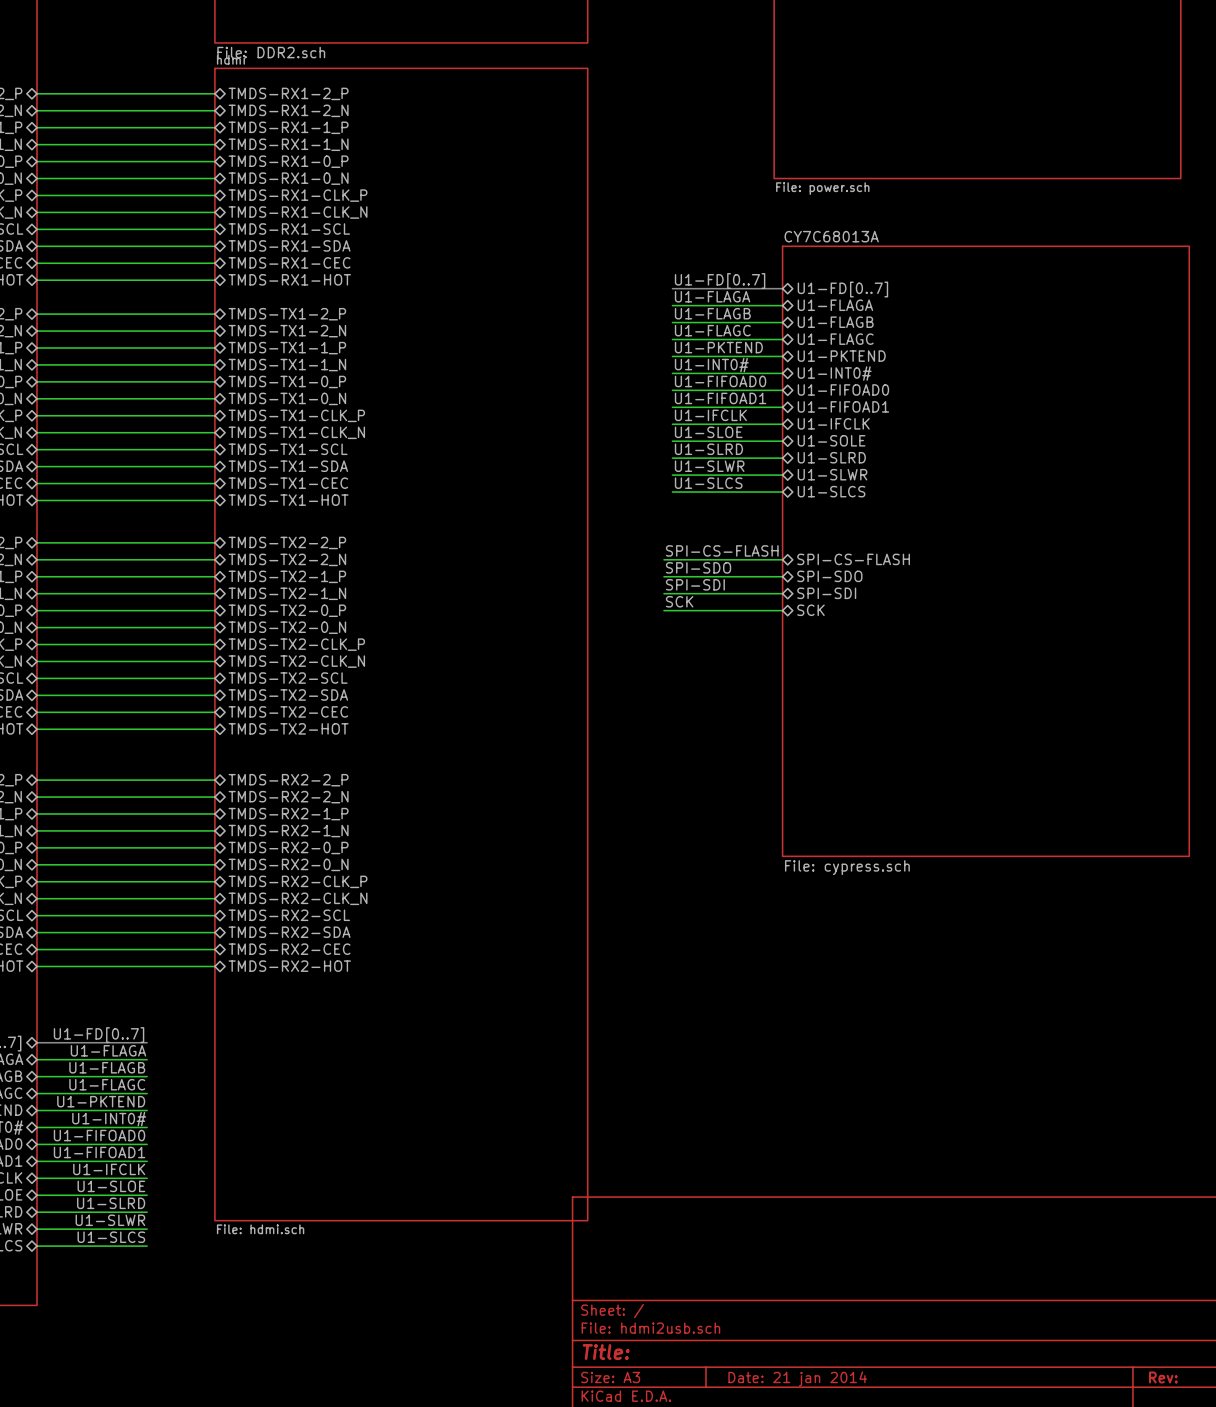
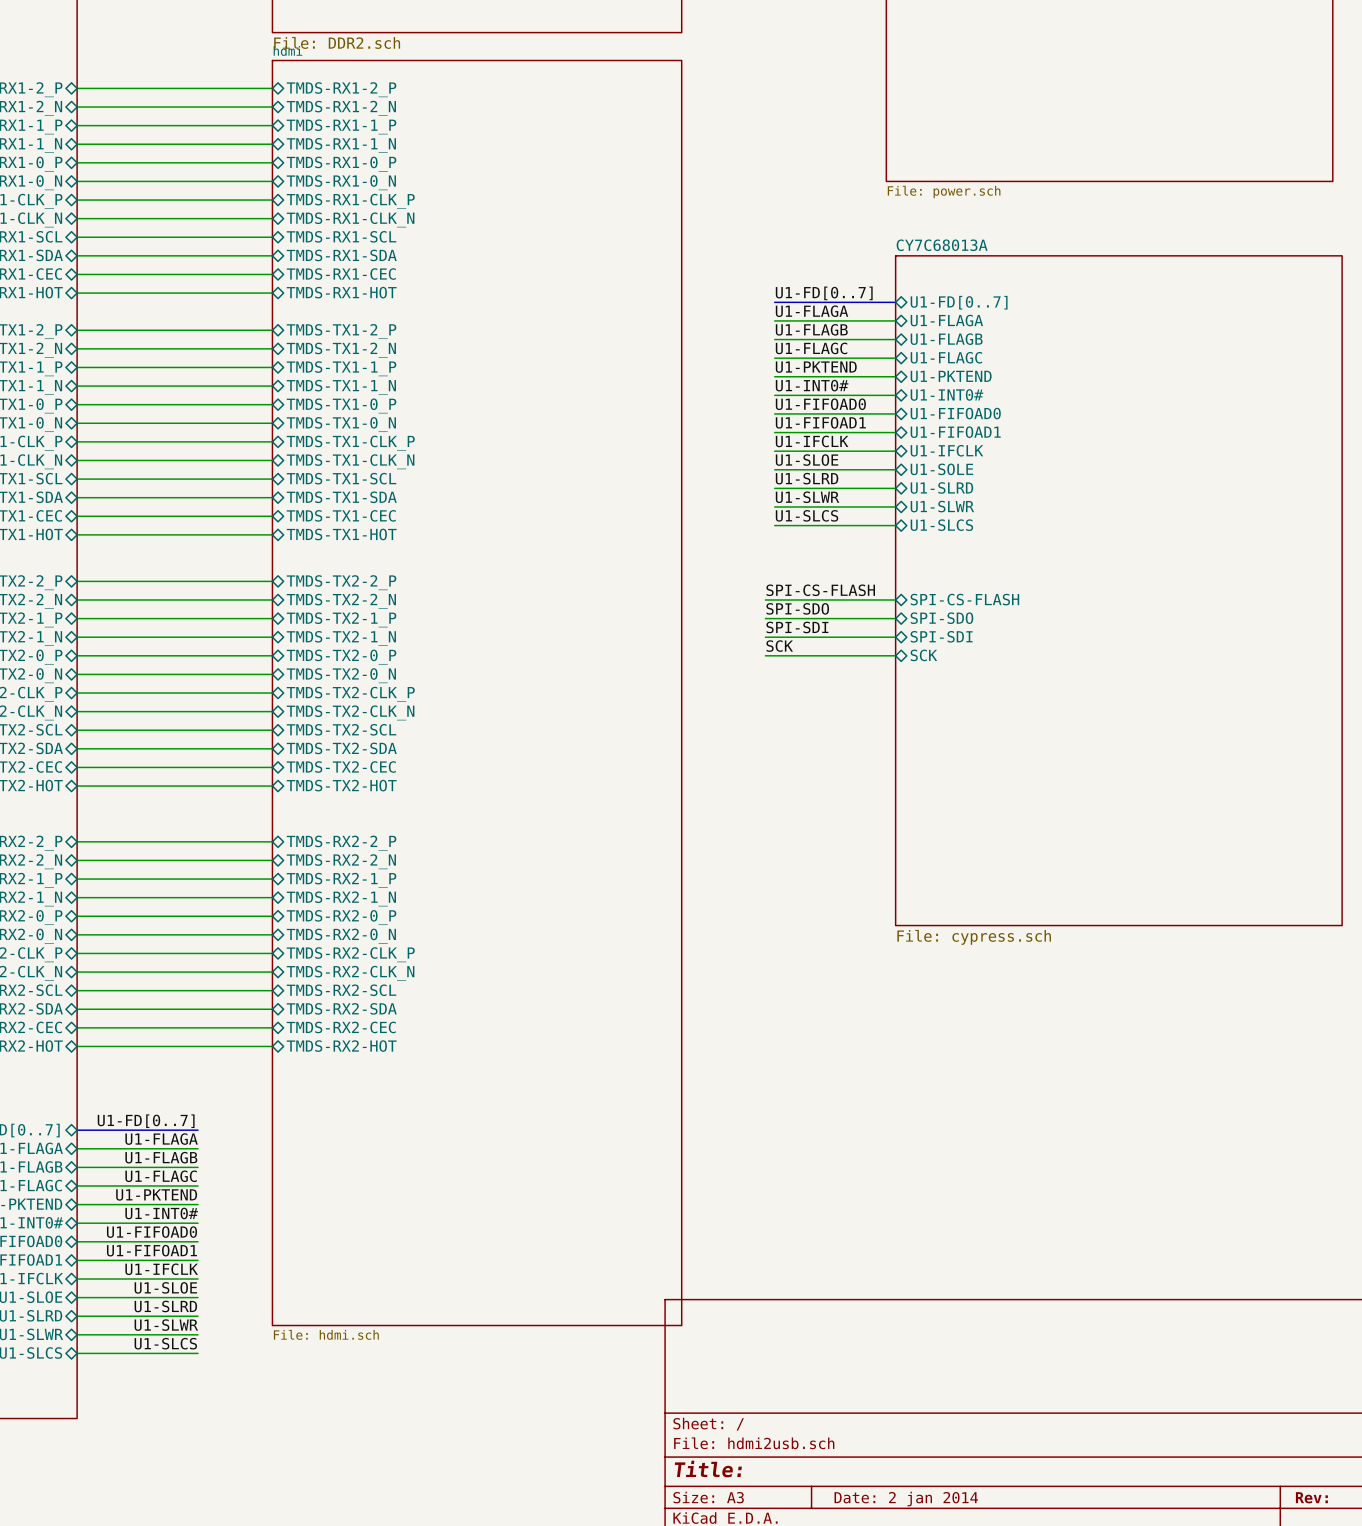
title block: Date: 21 jan 2014 (797, 1378) -> Date: 2 jan 2014 (906, 1499)

